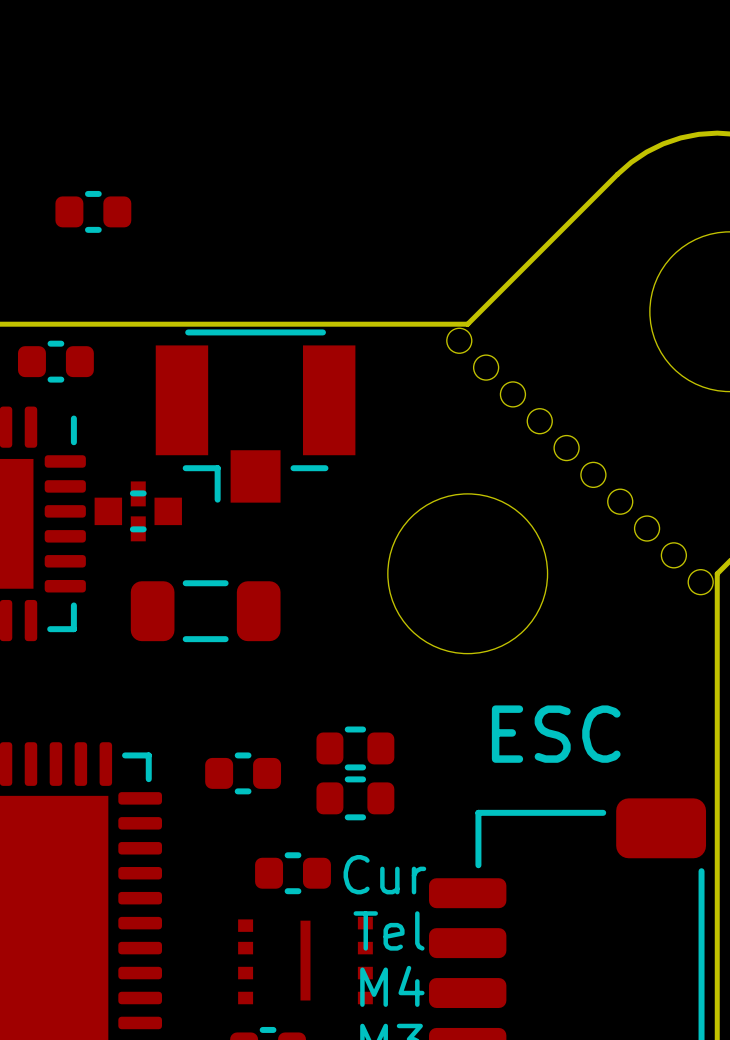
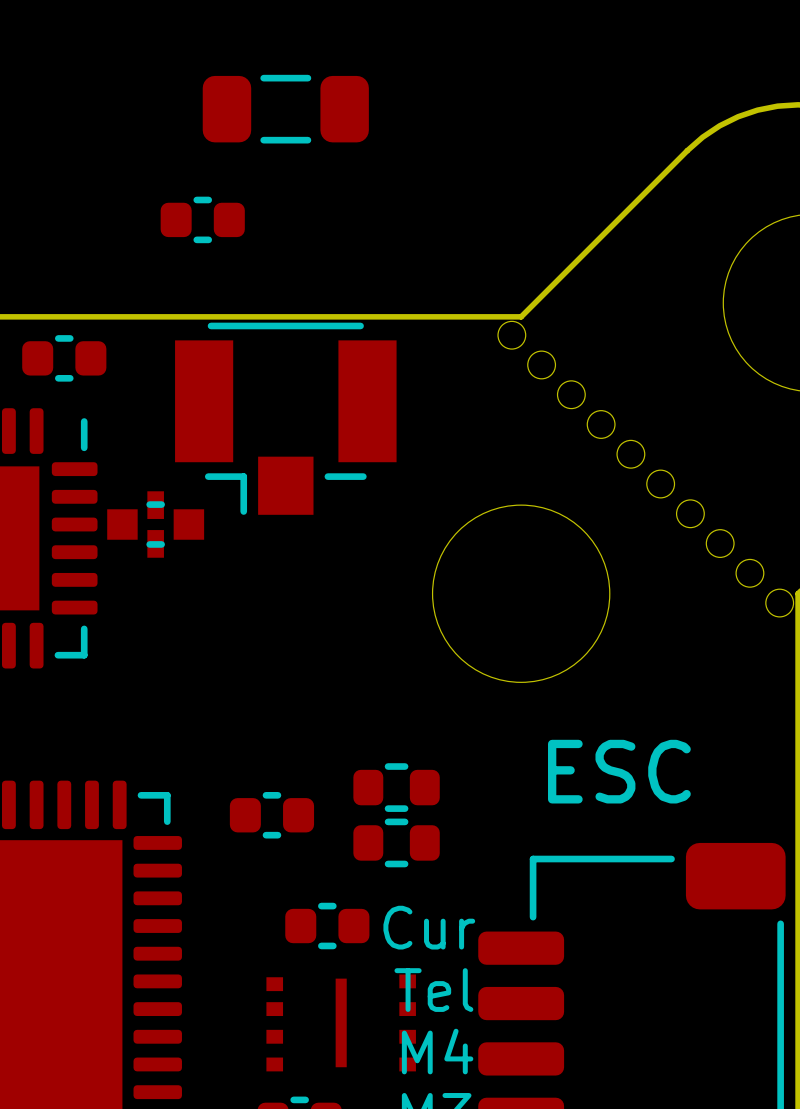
part position: (93, 211) -> (202, 219)
part position: (205, 611) -> (285, 109)

